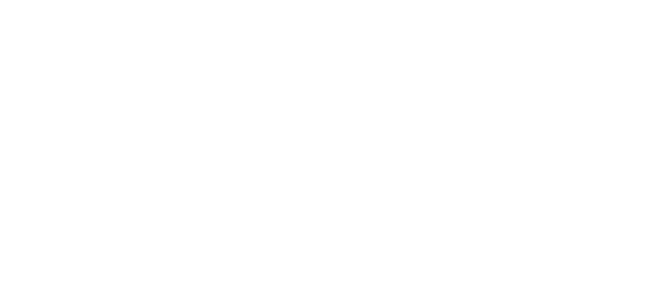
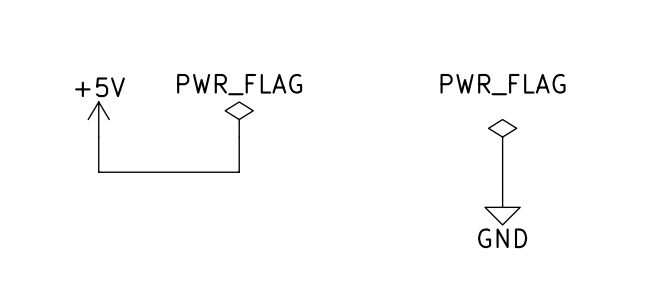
power symbol: none -> +5V (98, 119)
power symbol: none -> PWR_FLAG (239, 119)
wire: none -> (98, 137) (98, 172) (239, 172) (239, 137)
power symbol: none -> PWR_FLAG (502, 137)
wire: none -> (502, 154) (502, 189)
power symbol: none -> GND (502, 207)

